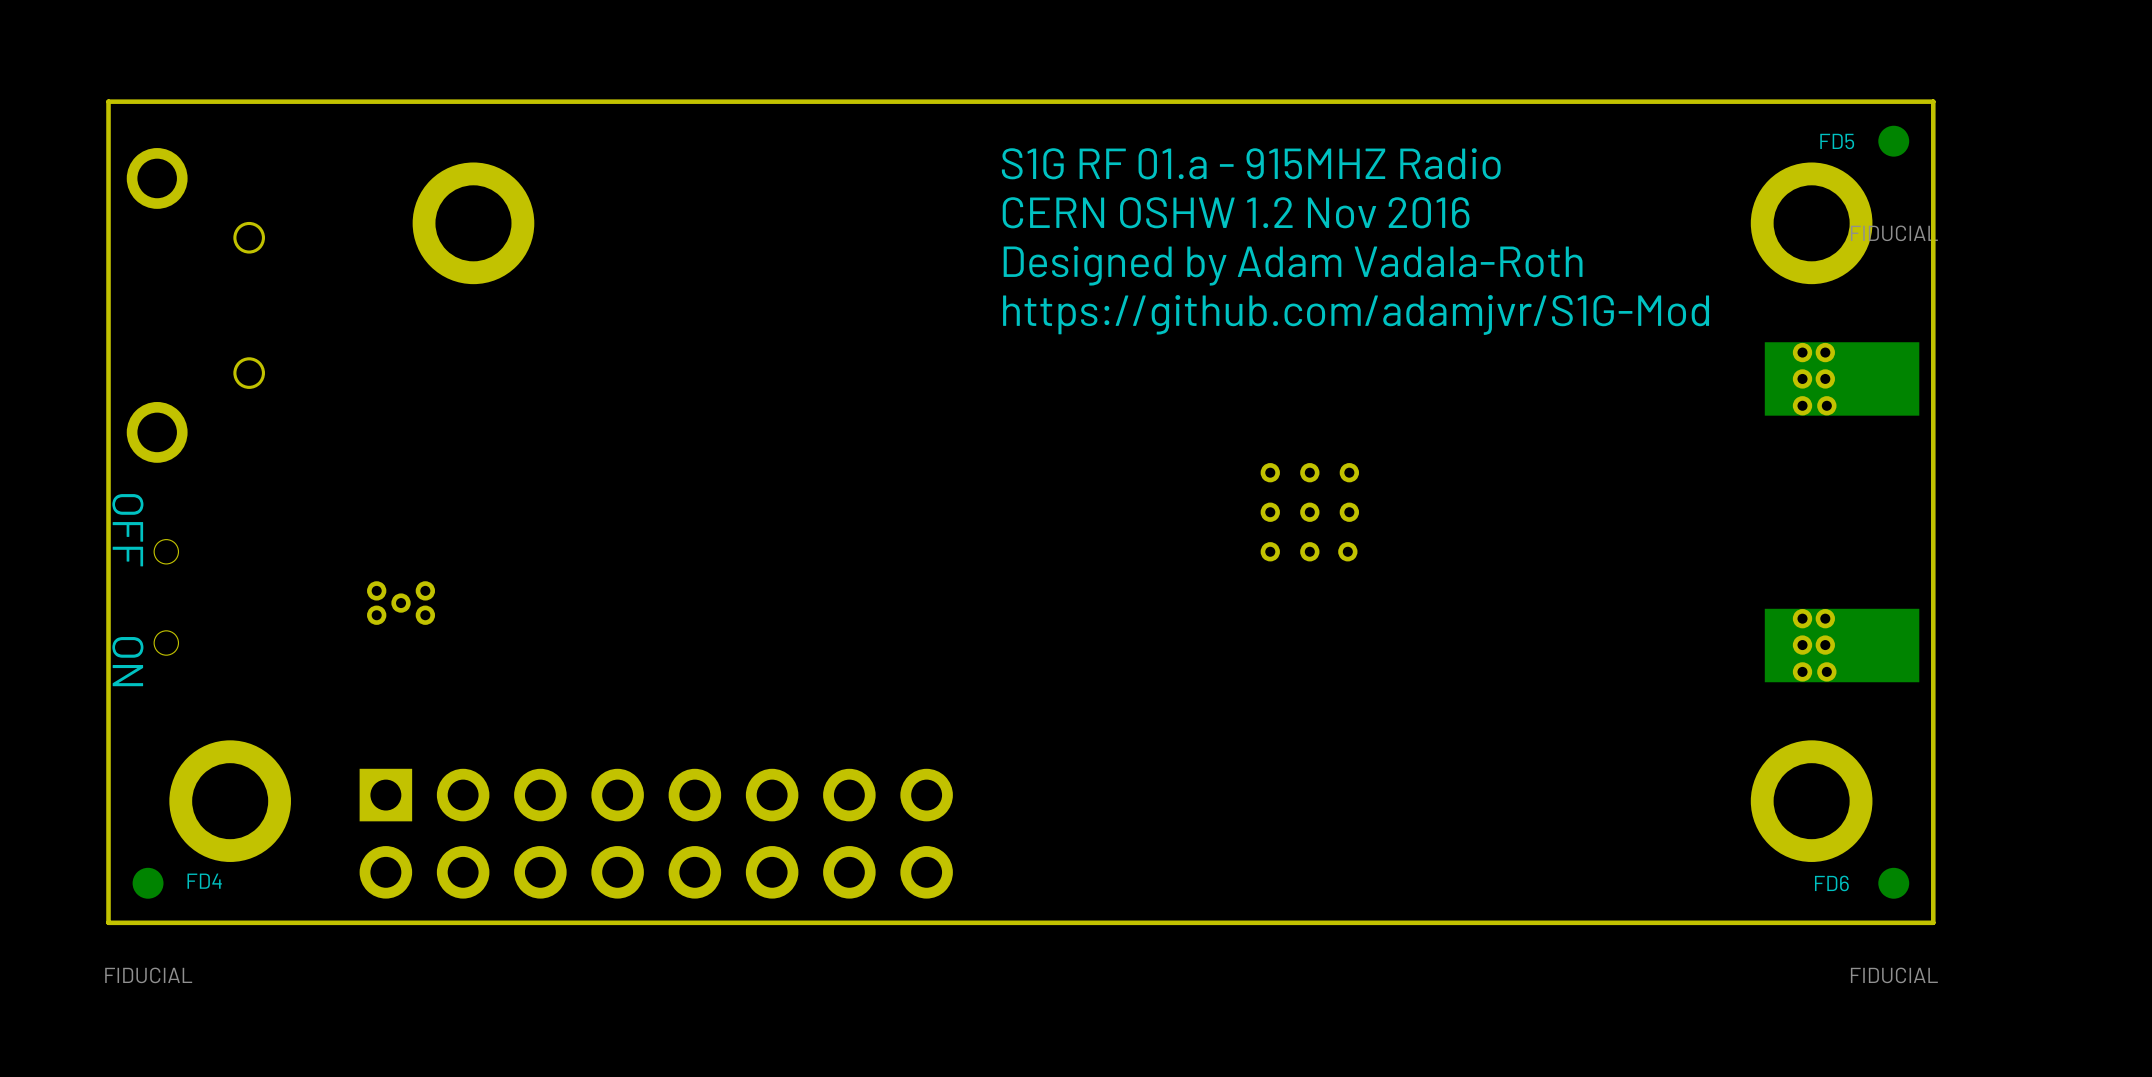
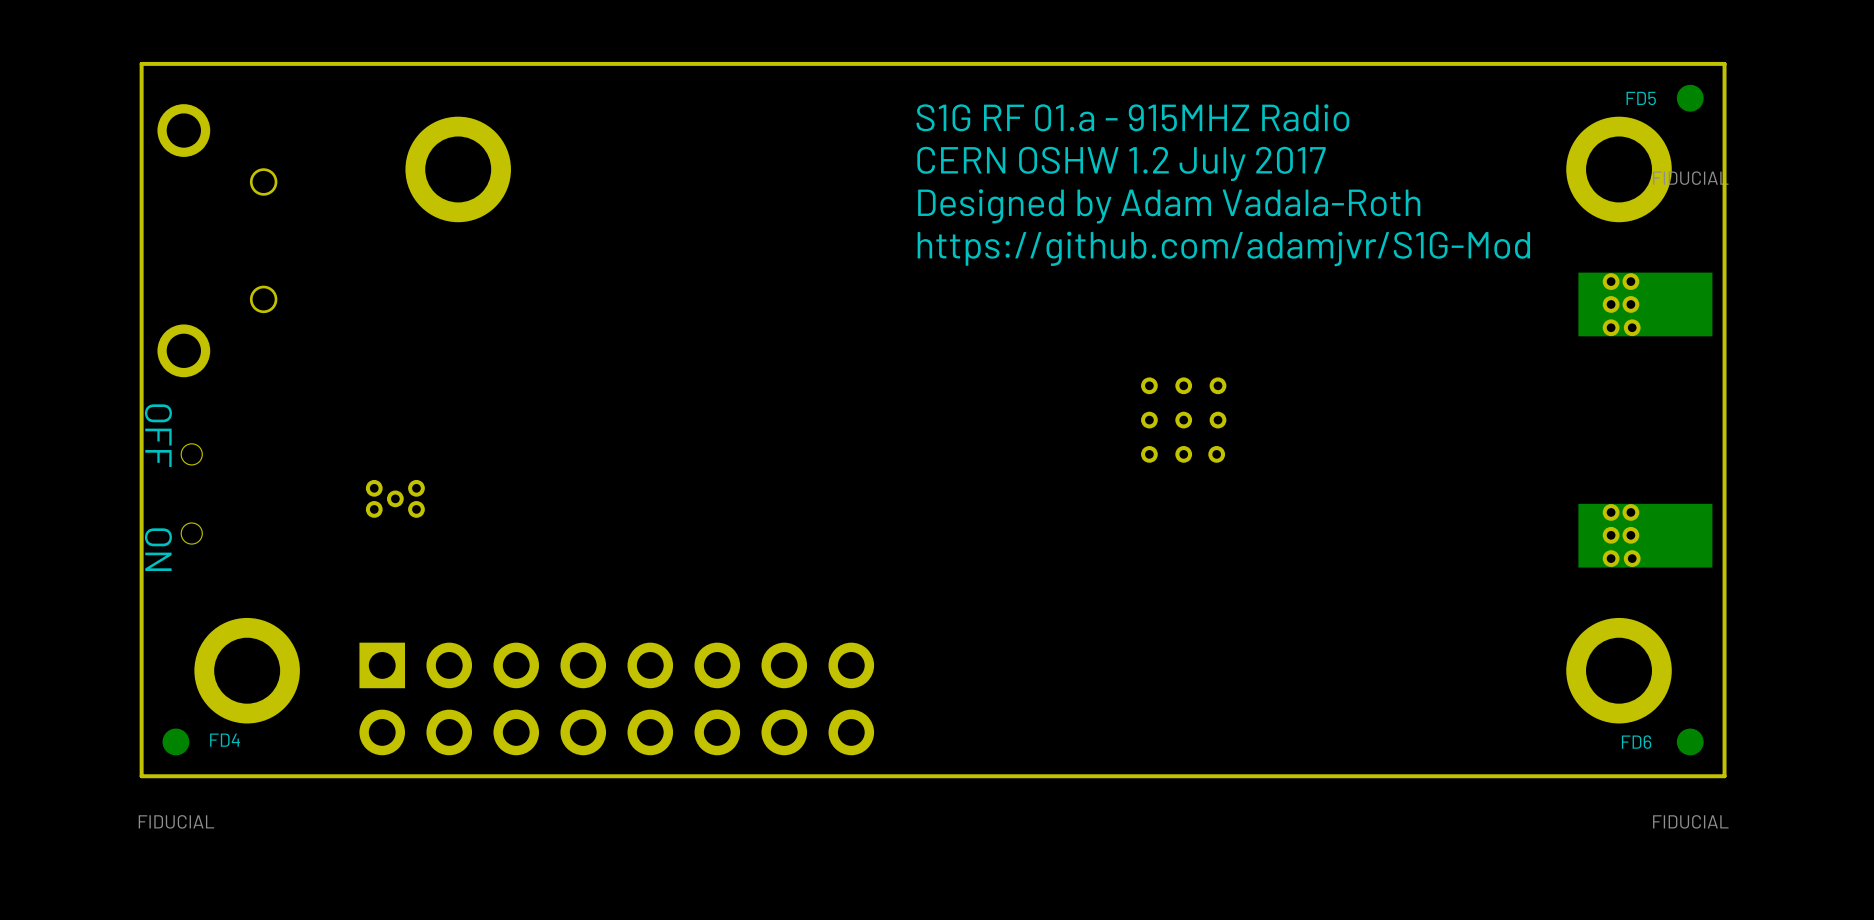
text: CERN OSHW 1.2 Nov 2016 (1236, 212) -> CERN OSHW 1.2 July 2017 (1121, 163)

